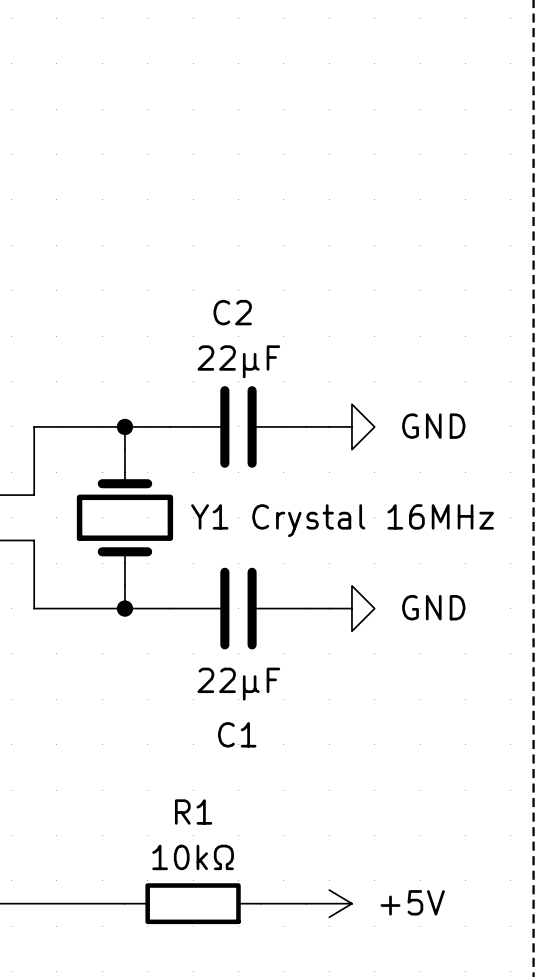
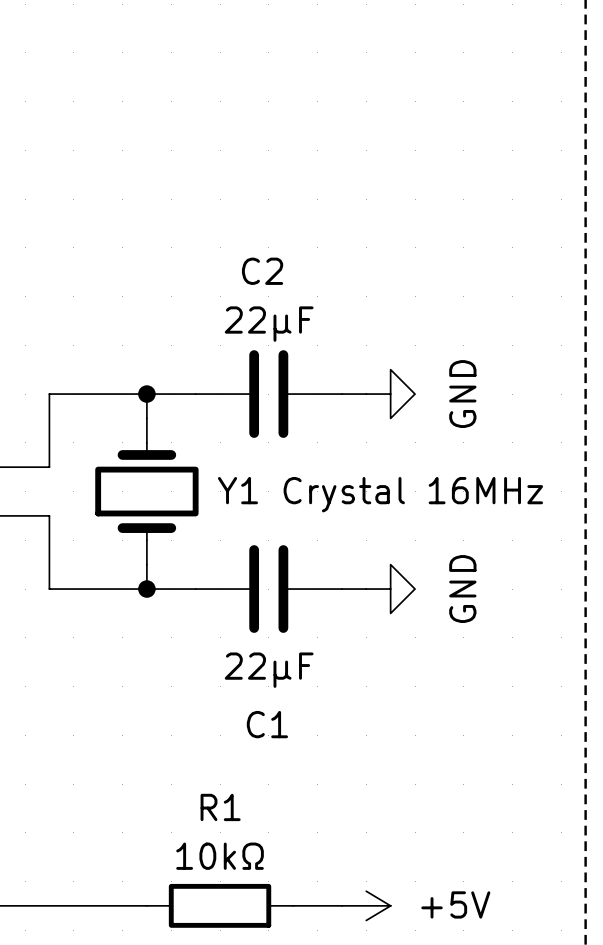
power symbol text rotation: 0° (433, 426) -> 90° counterclockwise (462, 394)
power symbol text rotation: 0° (433, 607) -> 90° counterclockwise (462, 589)

